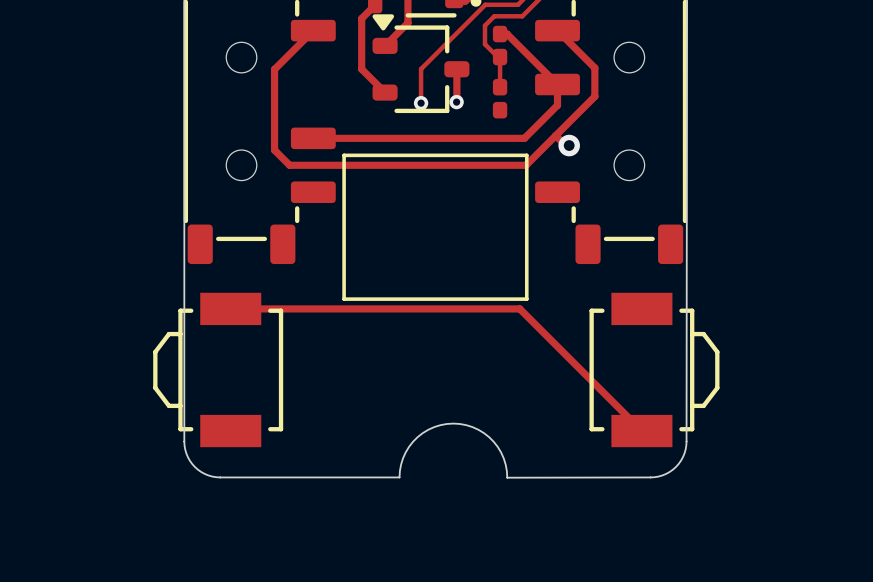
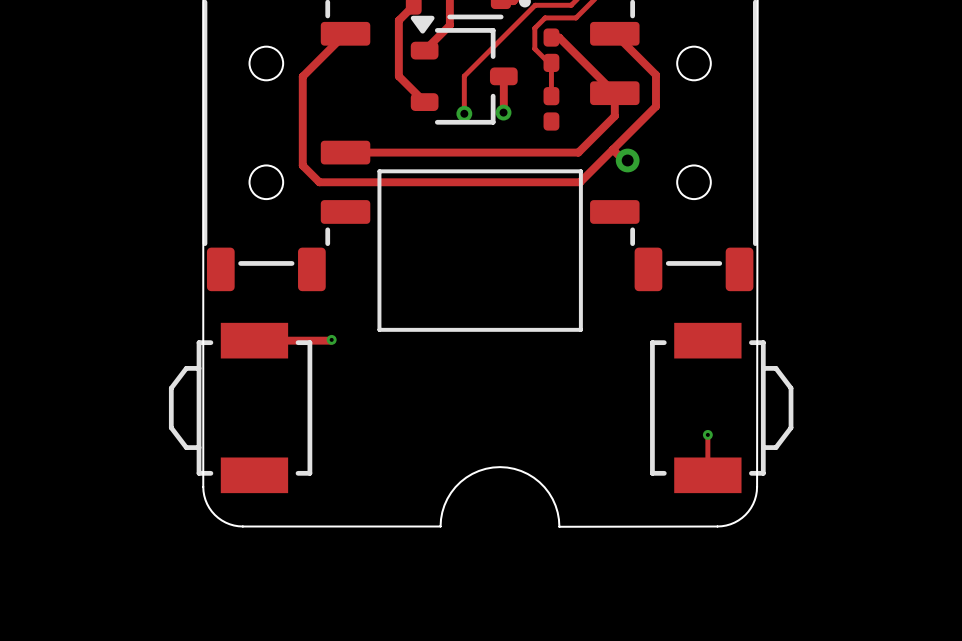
track: (300, 308) (519, 308) (641, 431) -> (707, 434) (707, 475)
via: none -> (331, 339)
via: none -> (707, 434)

